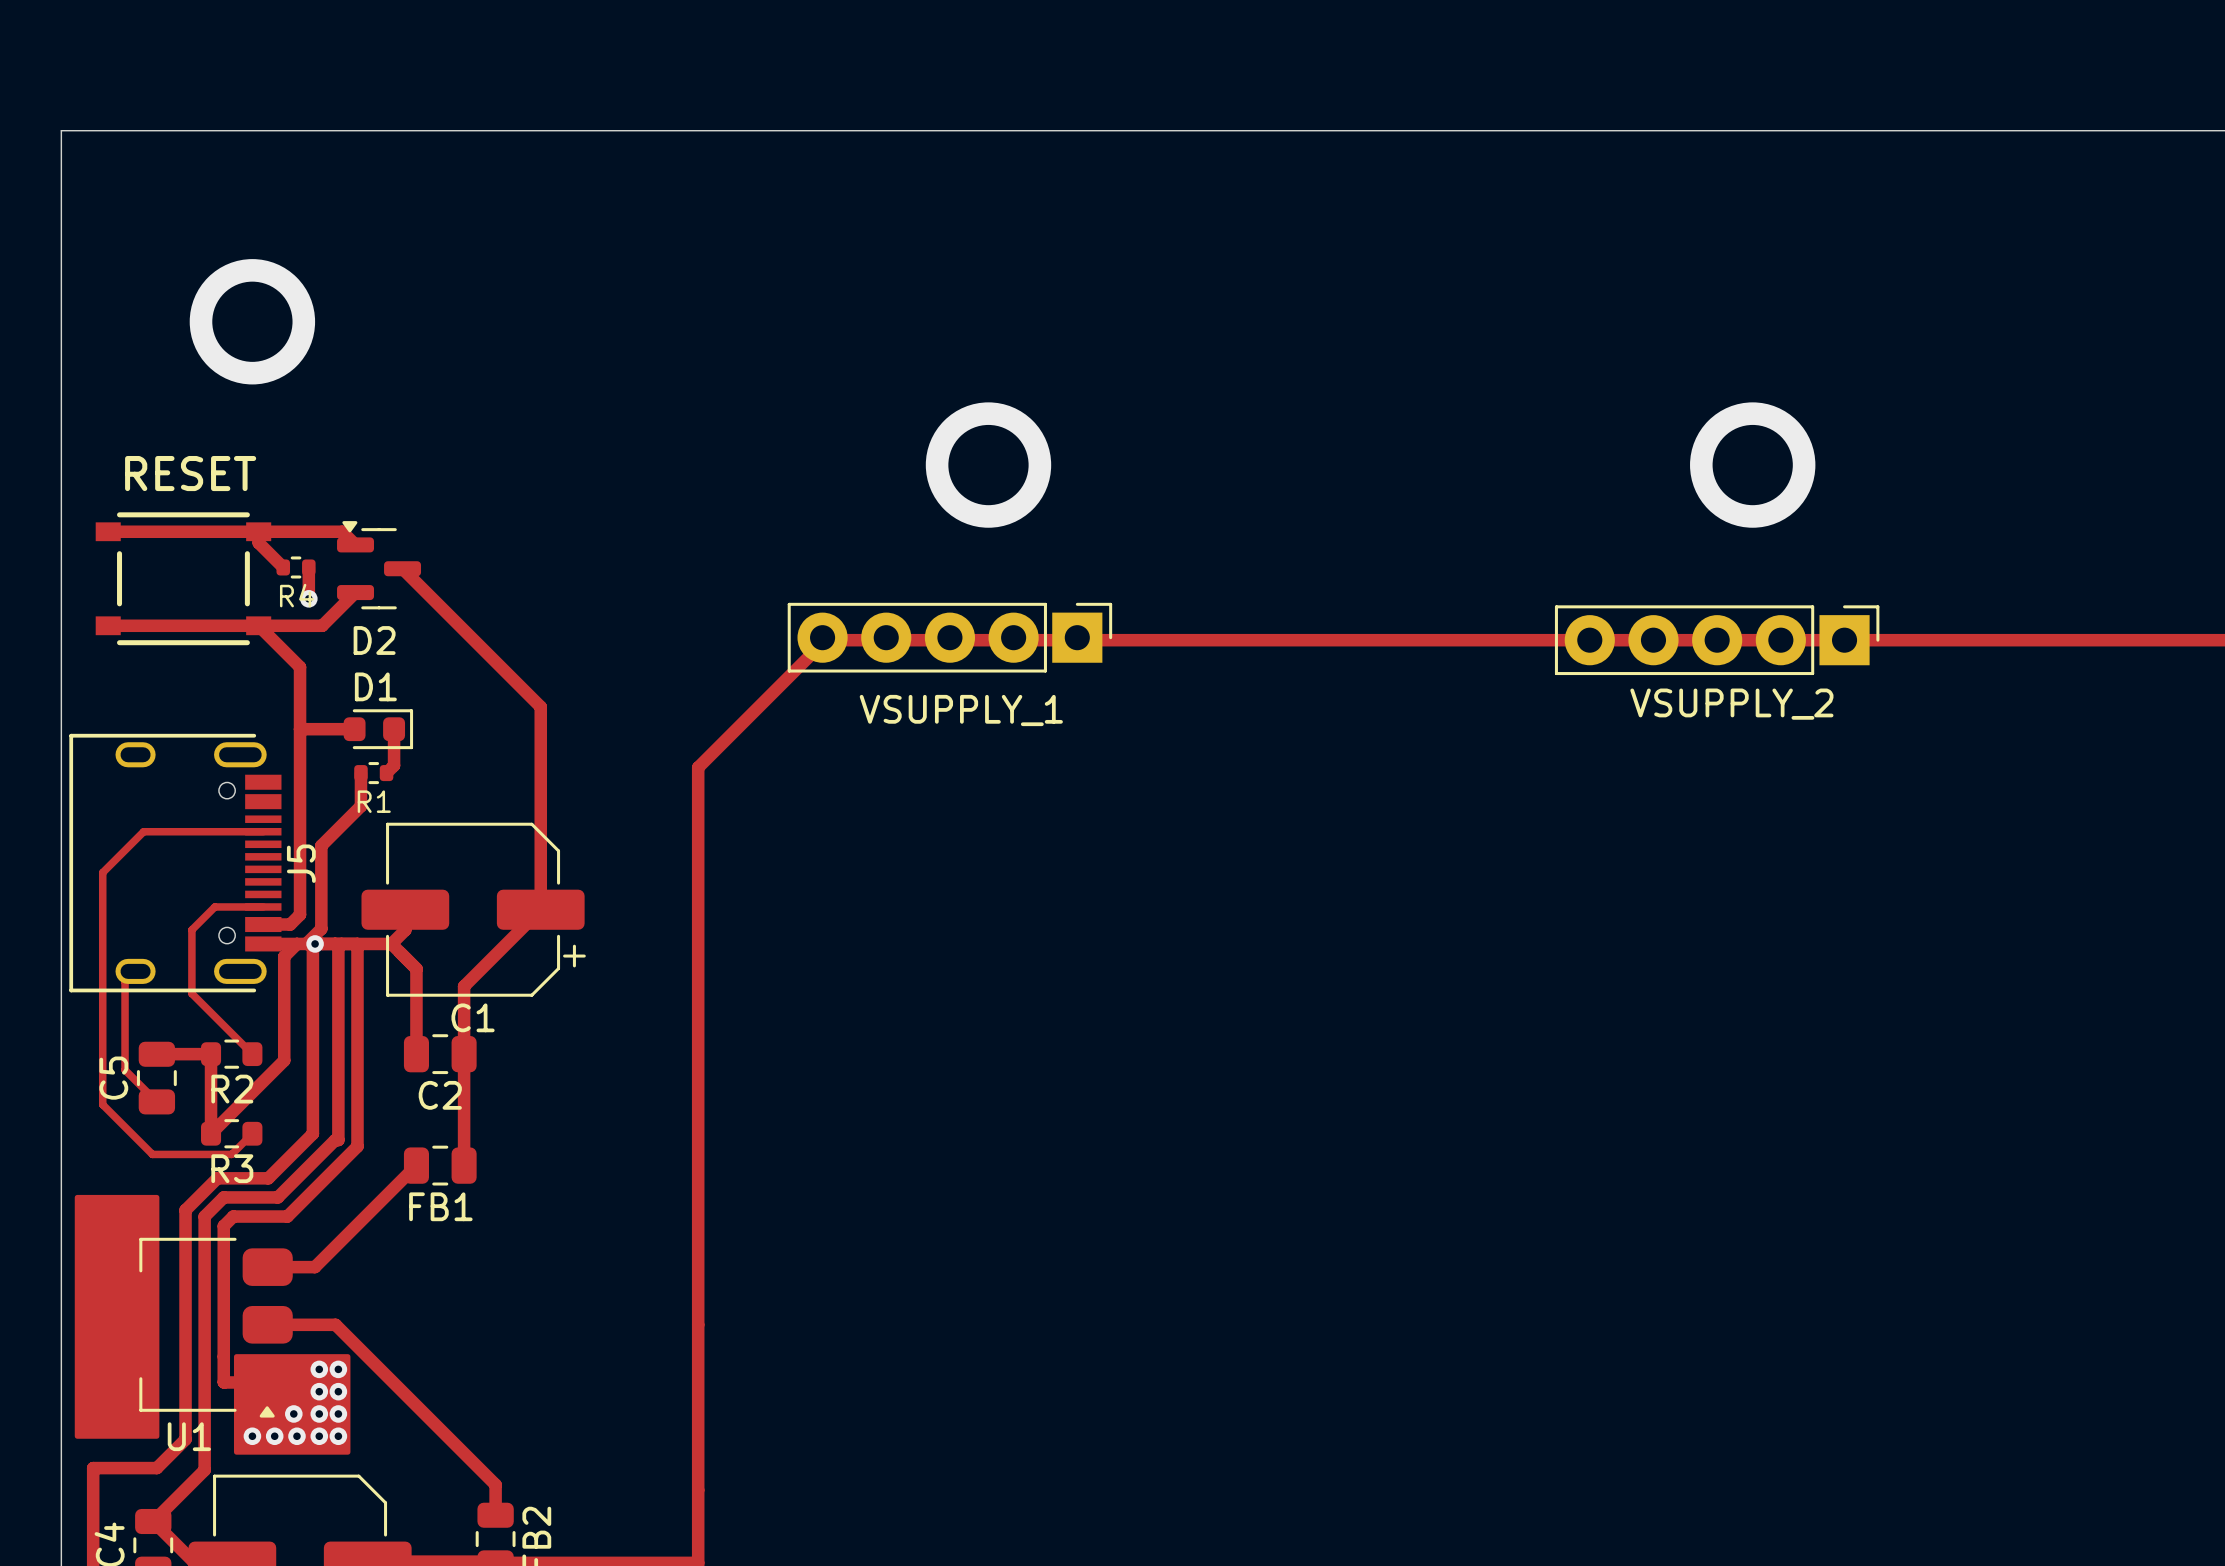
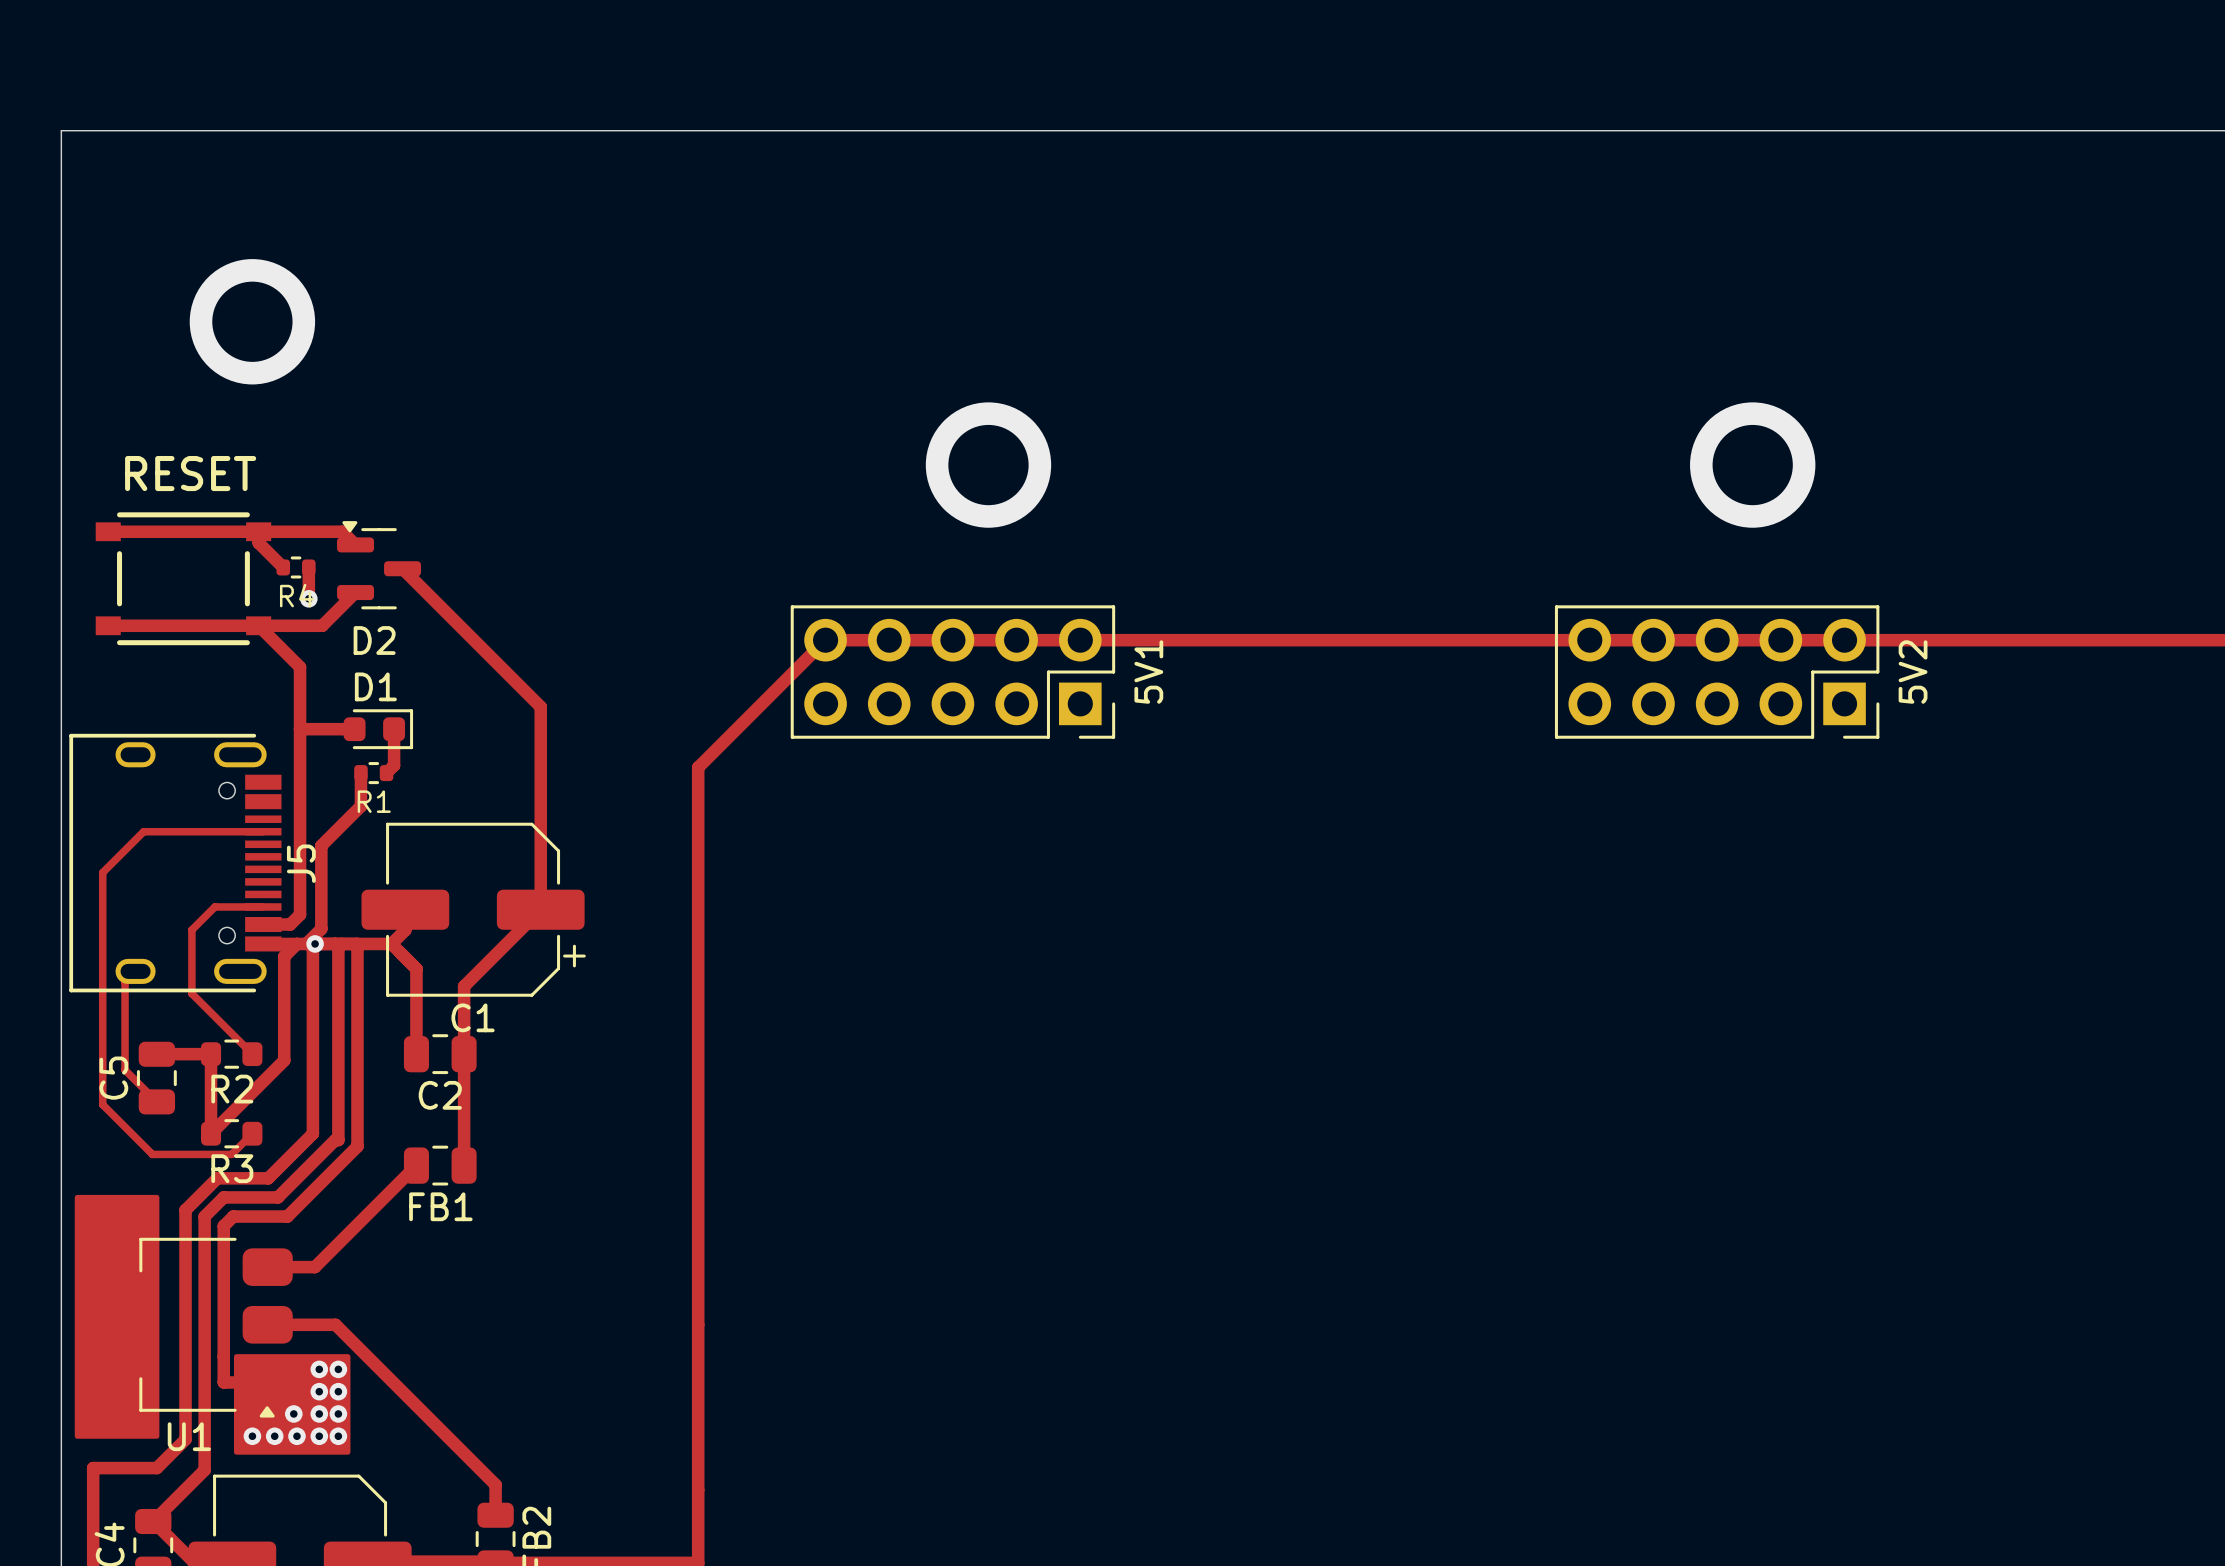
VSUPPLY_1: (949, 637) -> none
VSUPPLY_2: (1717, 640) -> none
5V1: none -> (952, 672)
5V2: none -> (1717, 672)

